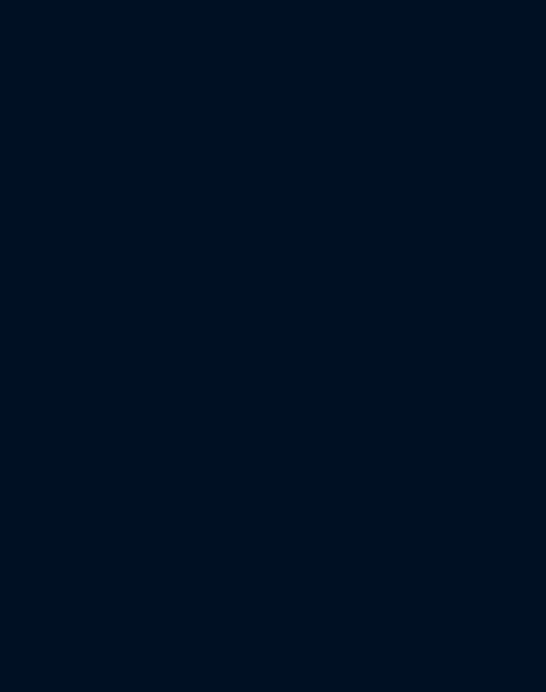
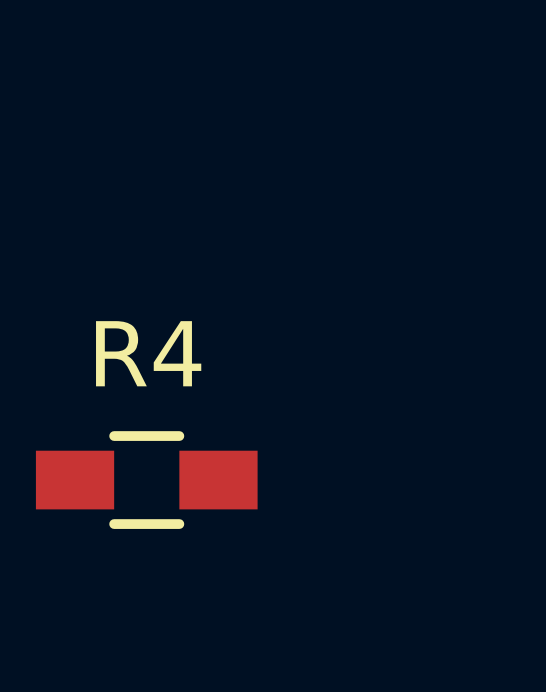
R4: none -> (146, 480)

